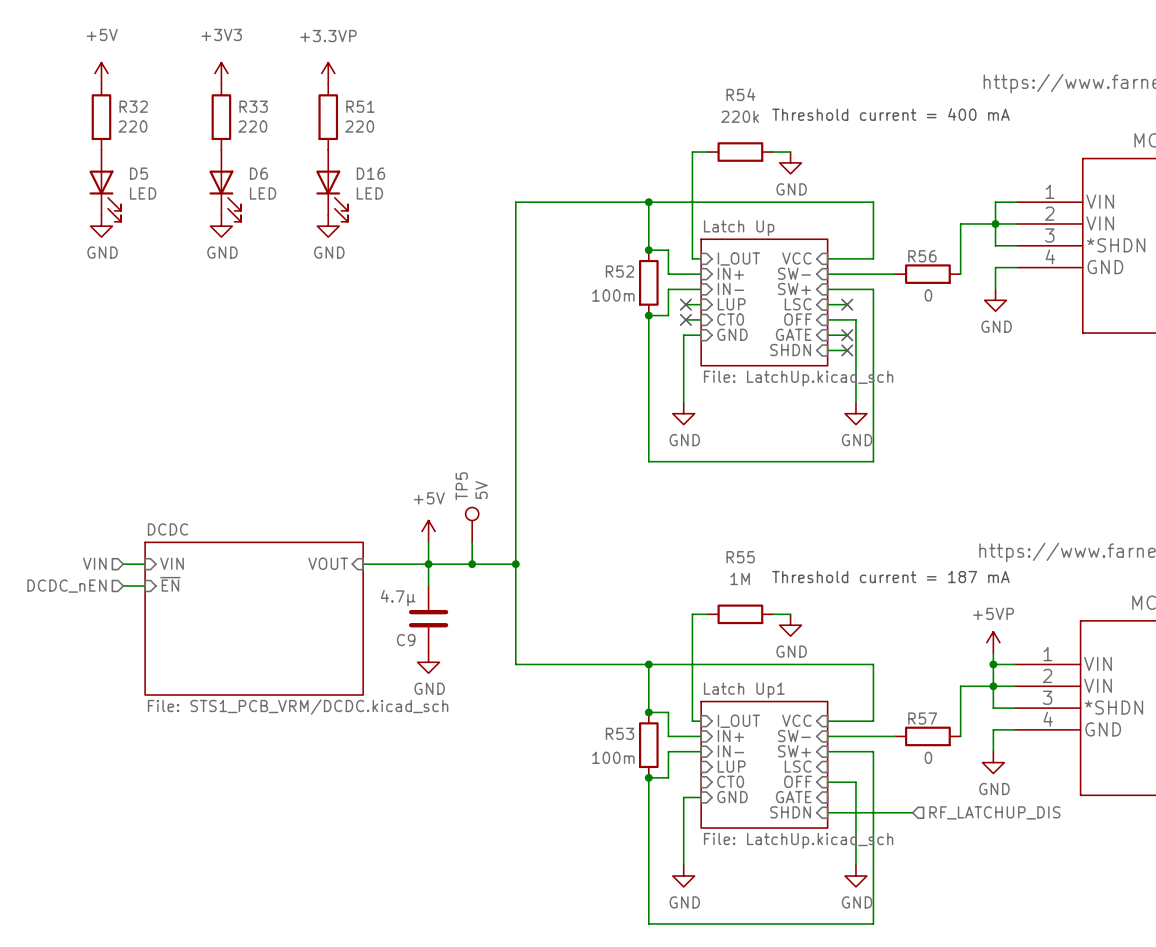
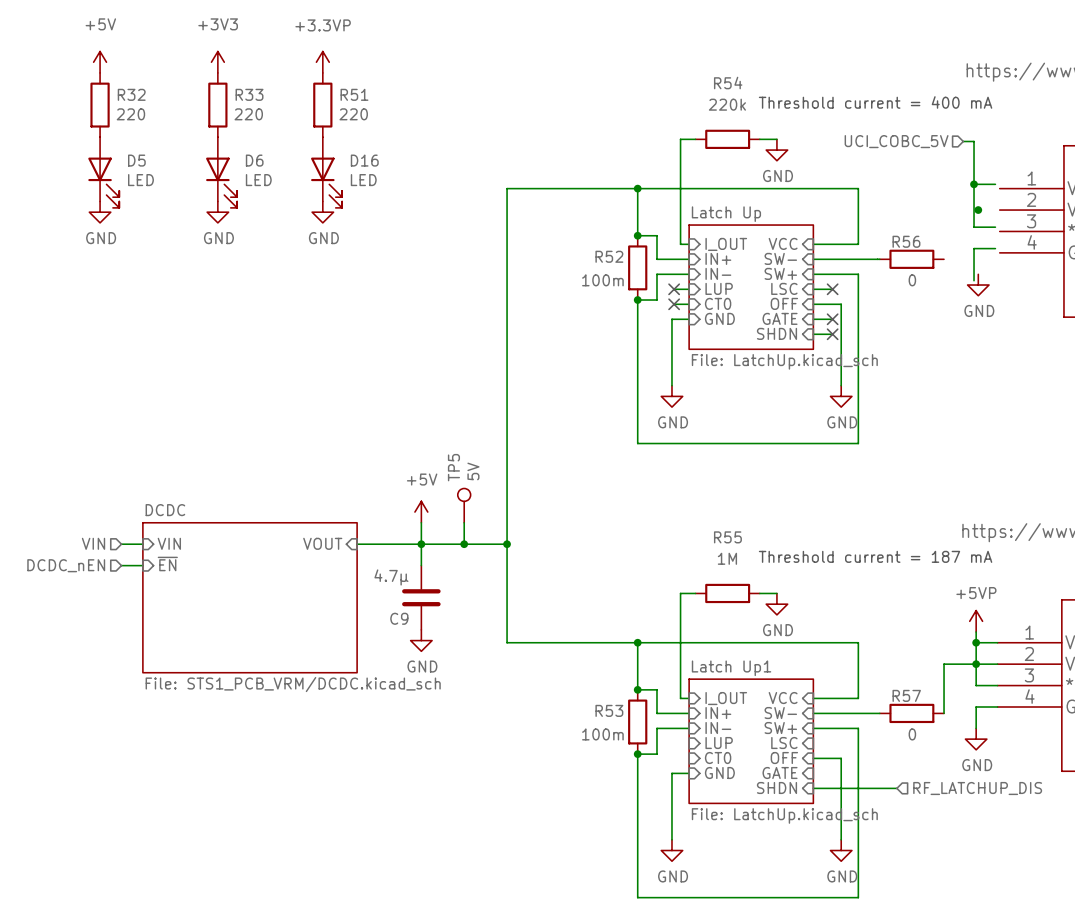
hierarchical label: none -> UCI_COBC_5V (896, 141)
wire: none -> (963, 141) (974, 141) (974, 227) (995, 227)
wire: none -> (974, 184) (995, 184)
junction: none -> (974, 184)
wire: (1017, 202) (995, 202) (995, 245) (1017, 245) -> none
wire: (1017, 223) (960, 223) (960, 274) -> none
wire: none -> (995, 248) (974, 248) (974, 280)
wire: (1017, 267) (995, 267) (995, 289) -> none

